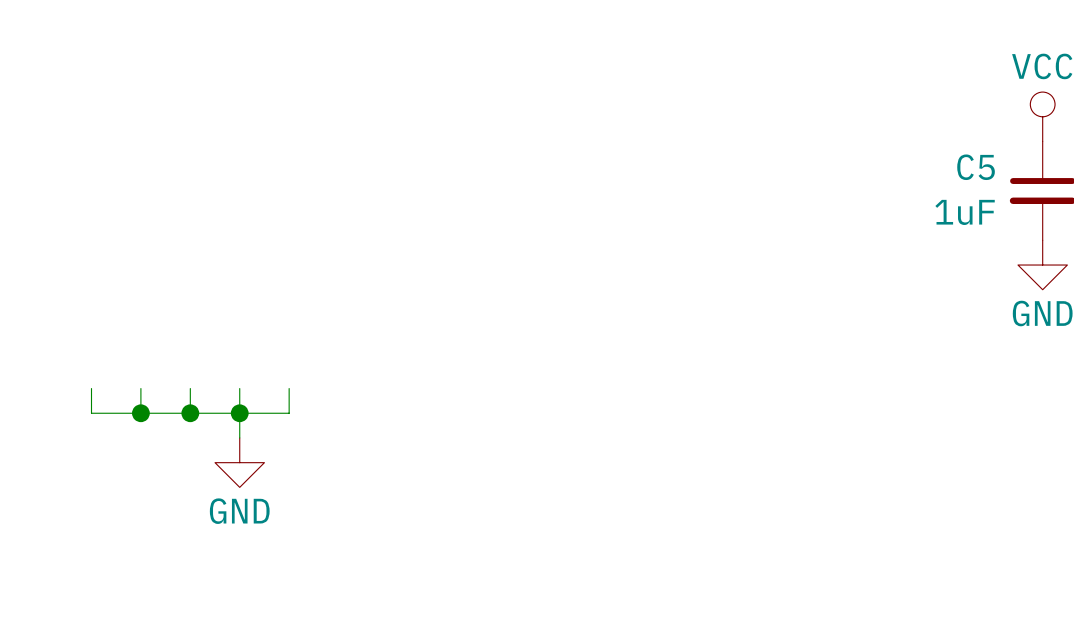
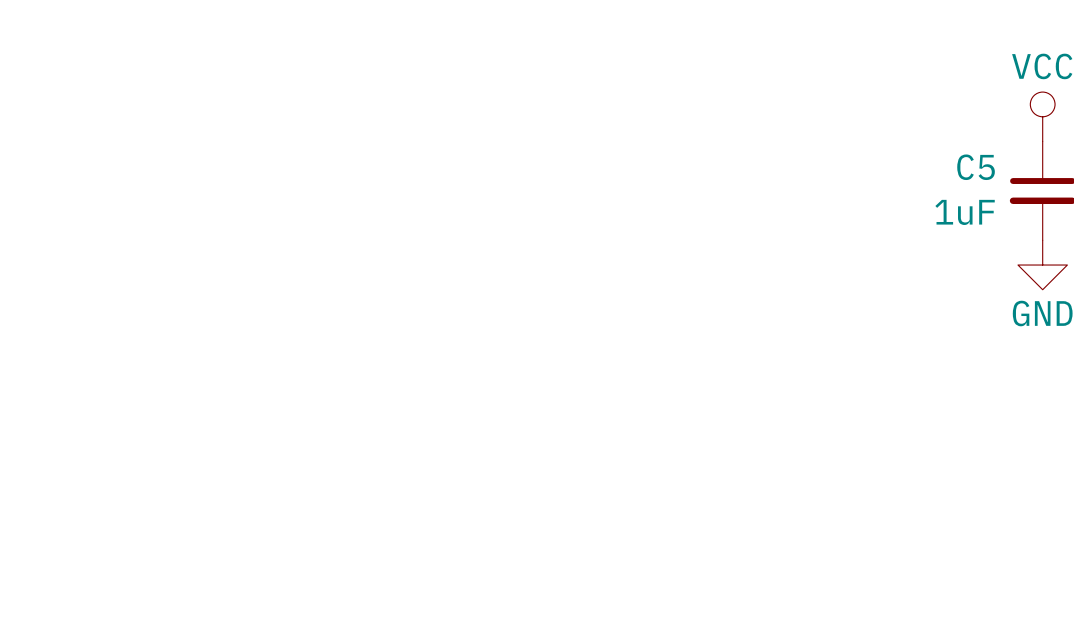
wire: (91, 388) (91, 413) (289, 413) (289, 388) -> none
wire: (140, 388) (140, 413) -> none
wire: (190, 388) (190, 413) -> none
wire: (239, 388) (239, 437) -> none
junction: (140, 413) -> none
junction: (190, 413) -> none
junction: (239, 413) -> none
power symbol: GND (239, 462) -> none

